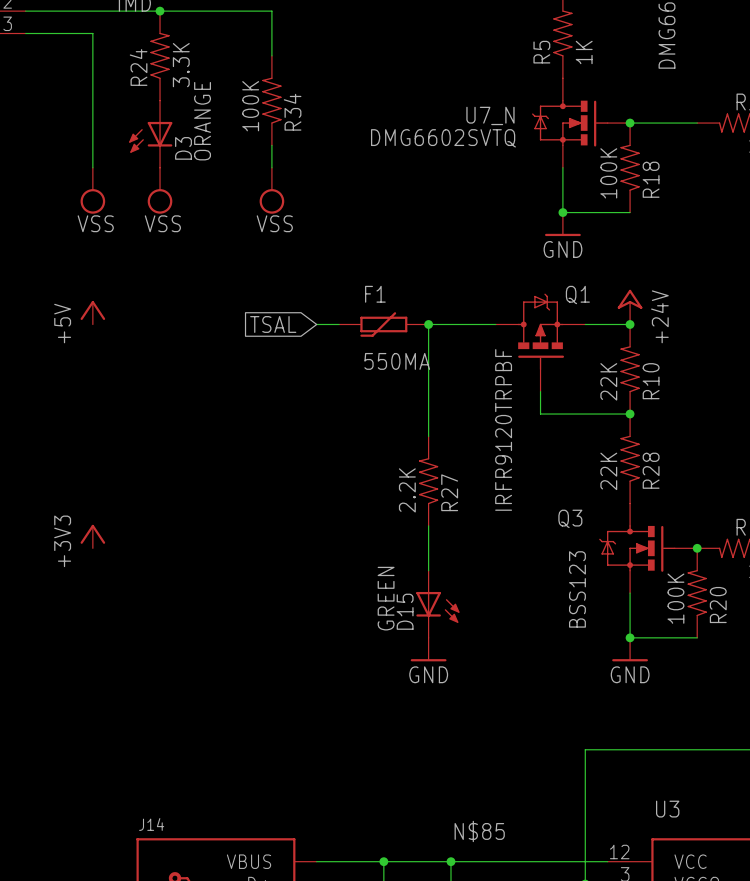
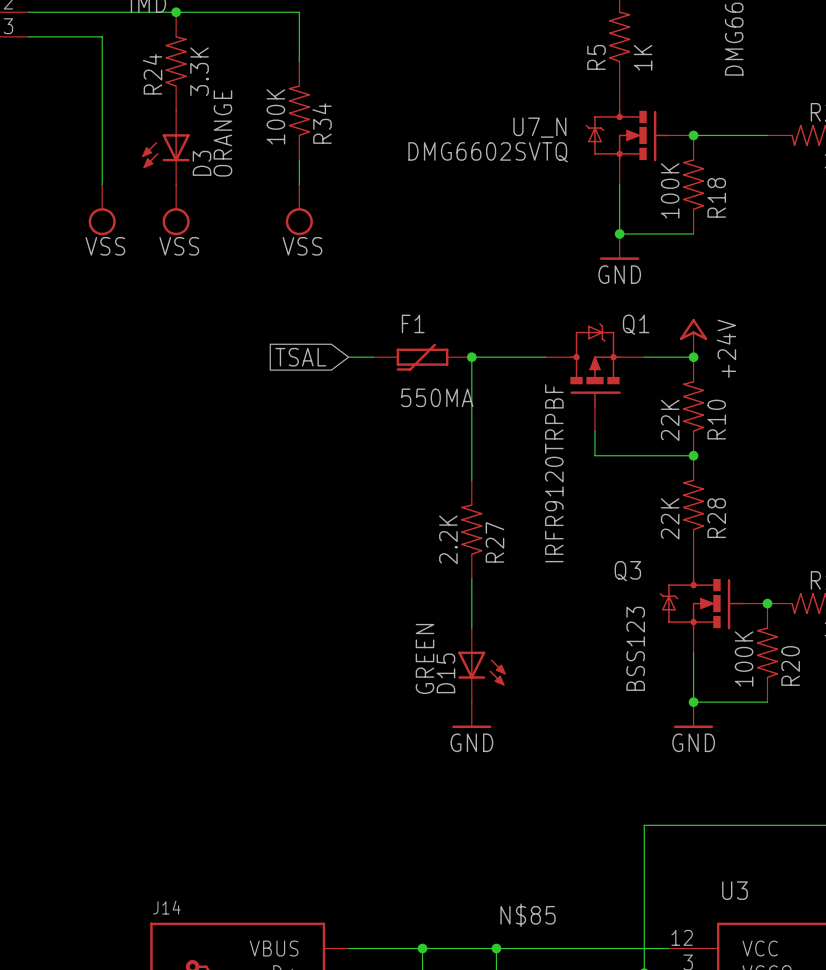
power symbol: +5V (92, 312) -> none
power symbol: +3V3 (92, 536) -> none

